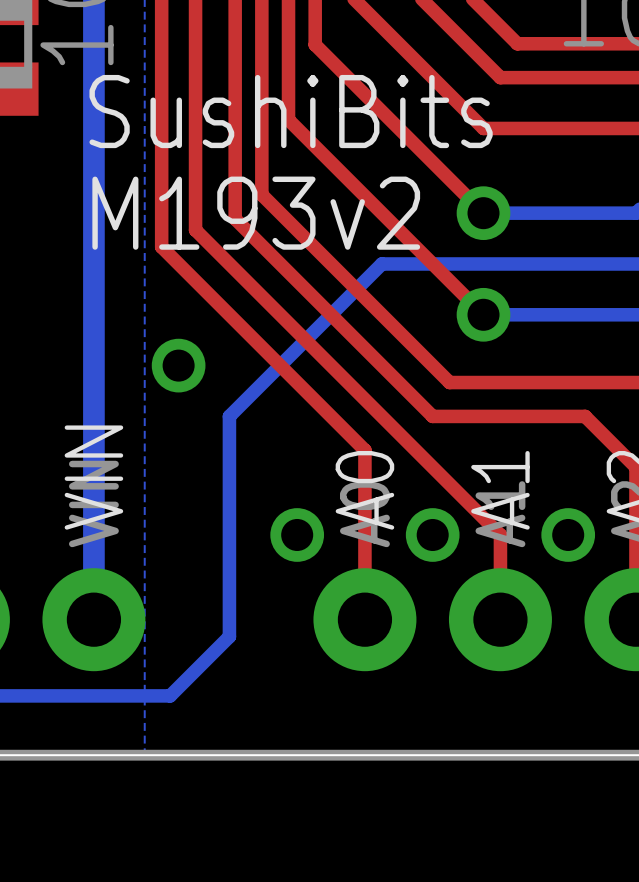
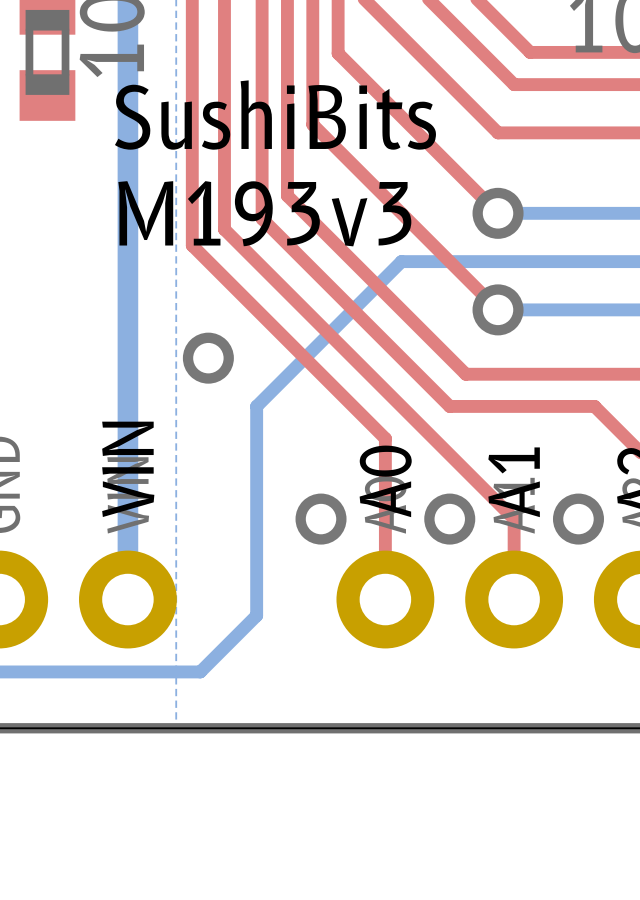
text: M193v2 (256, 213) -> M193v3 (264, 213)

